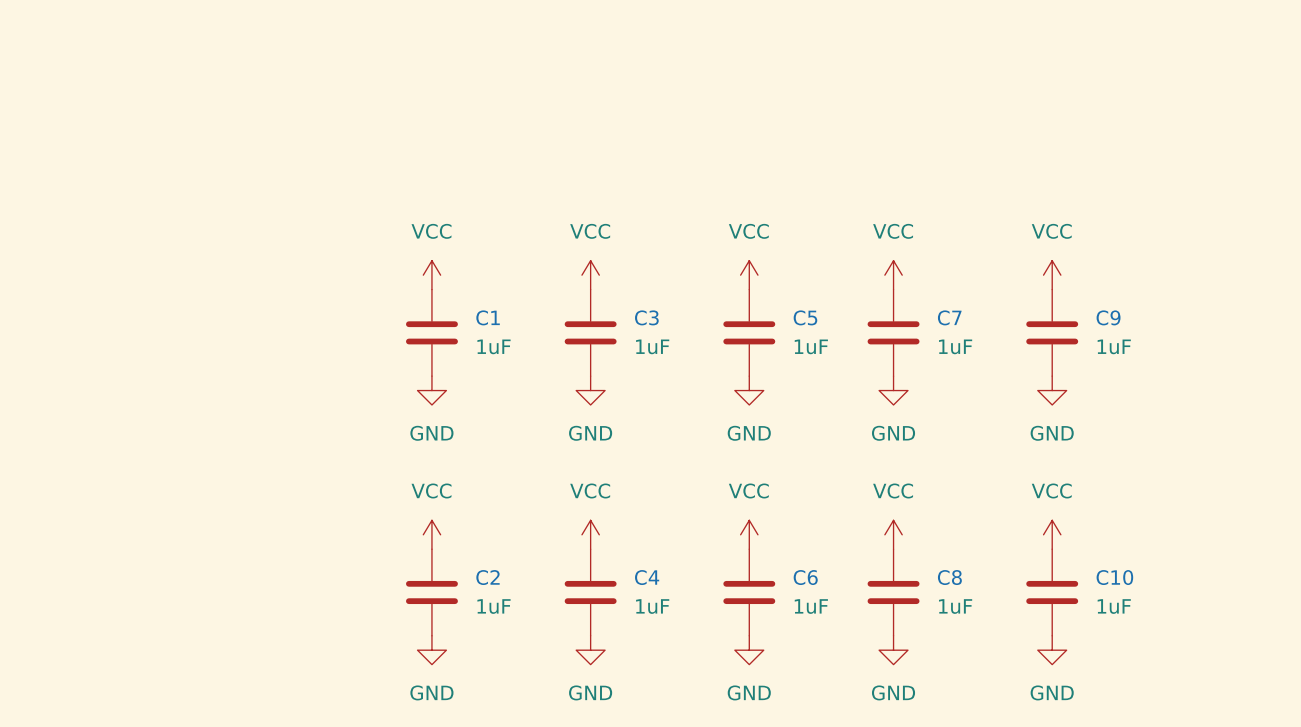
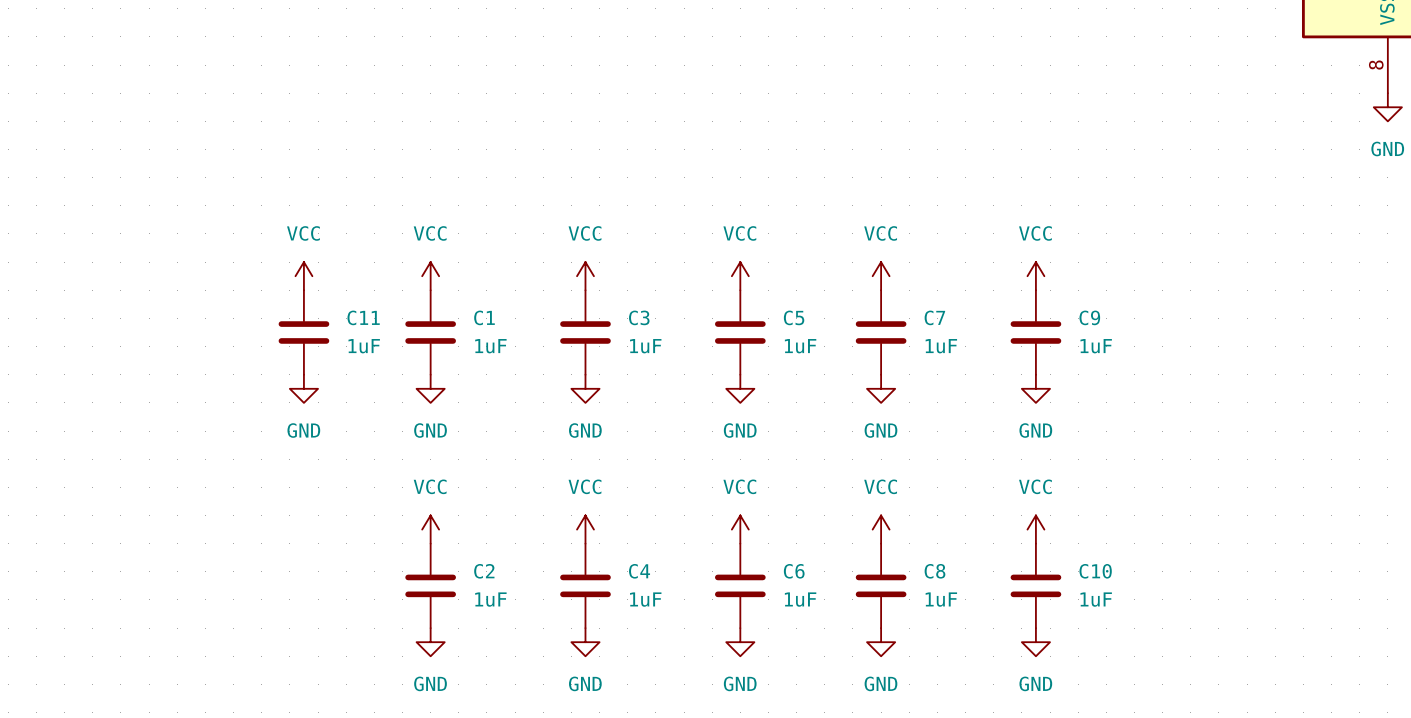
power symbol: none -> VCC (303, 276)
C11: none -> 1uF (303, 332)
power symbol: none -> GND (303, 388)

